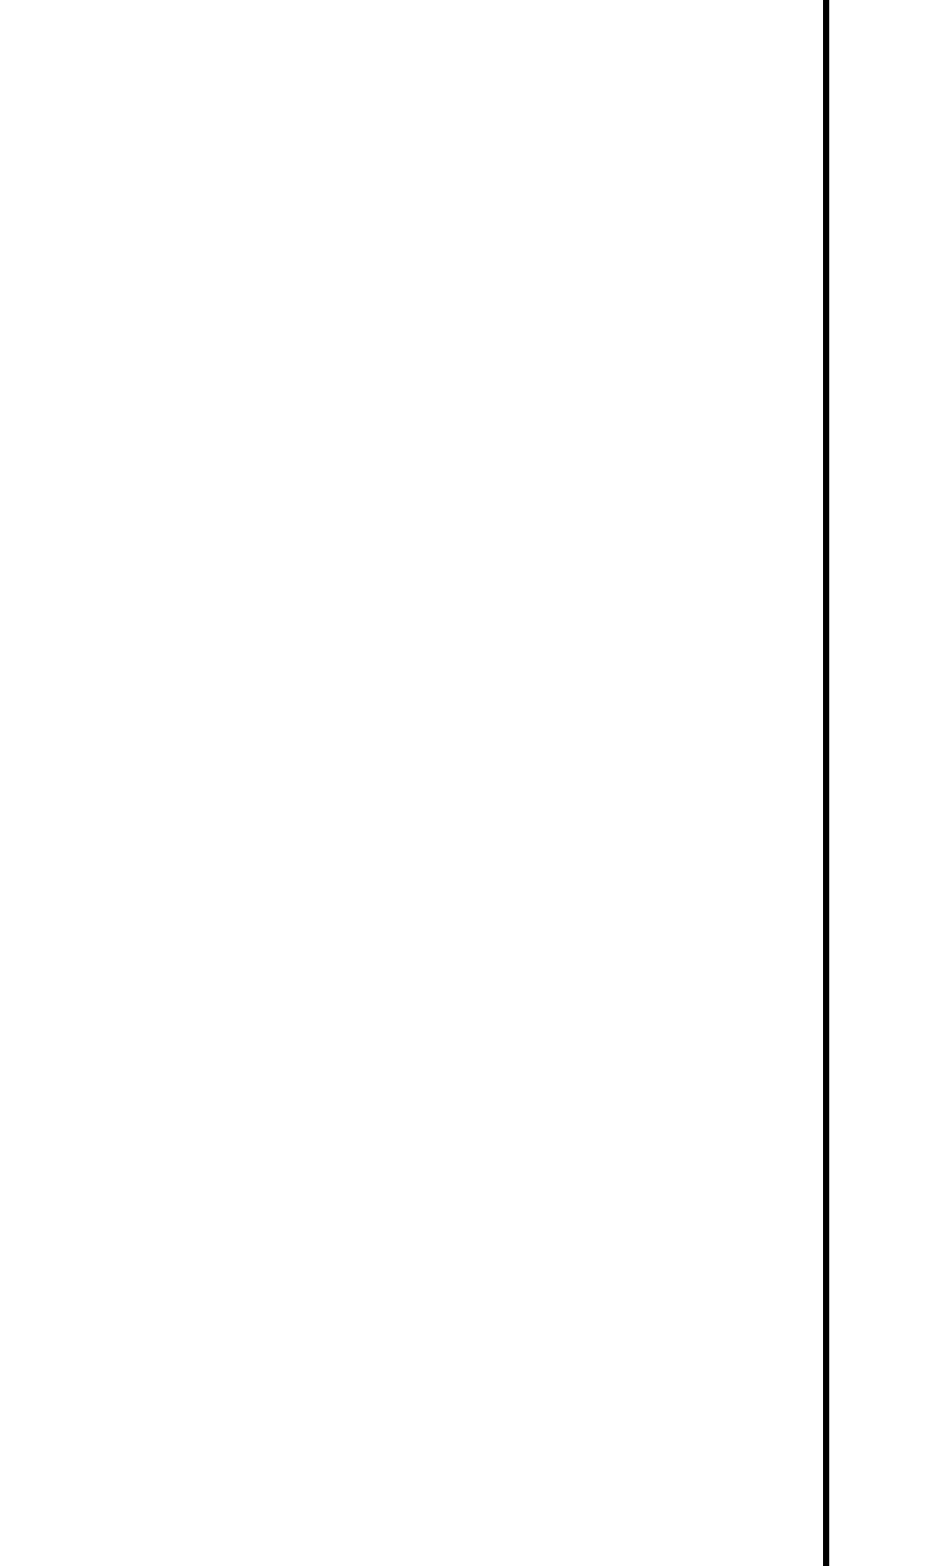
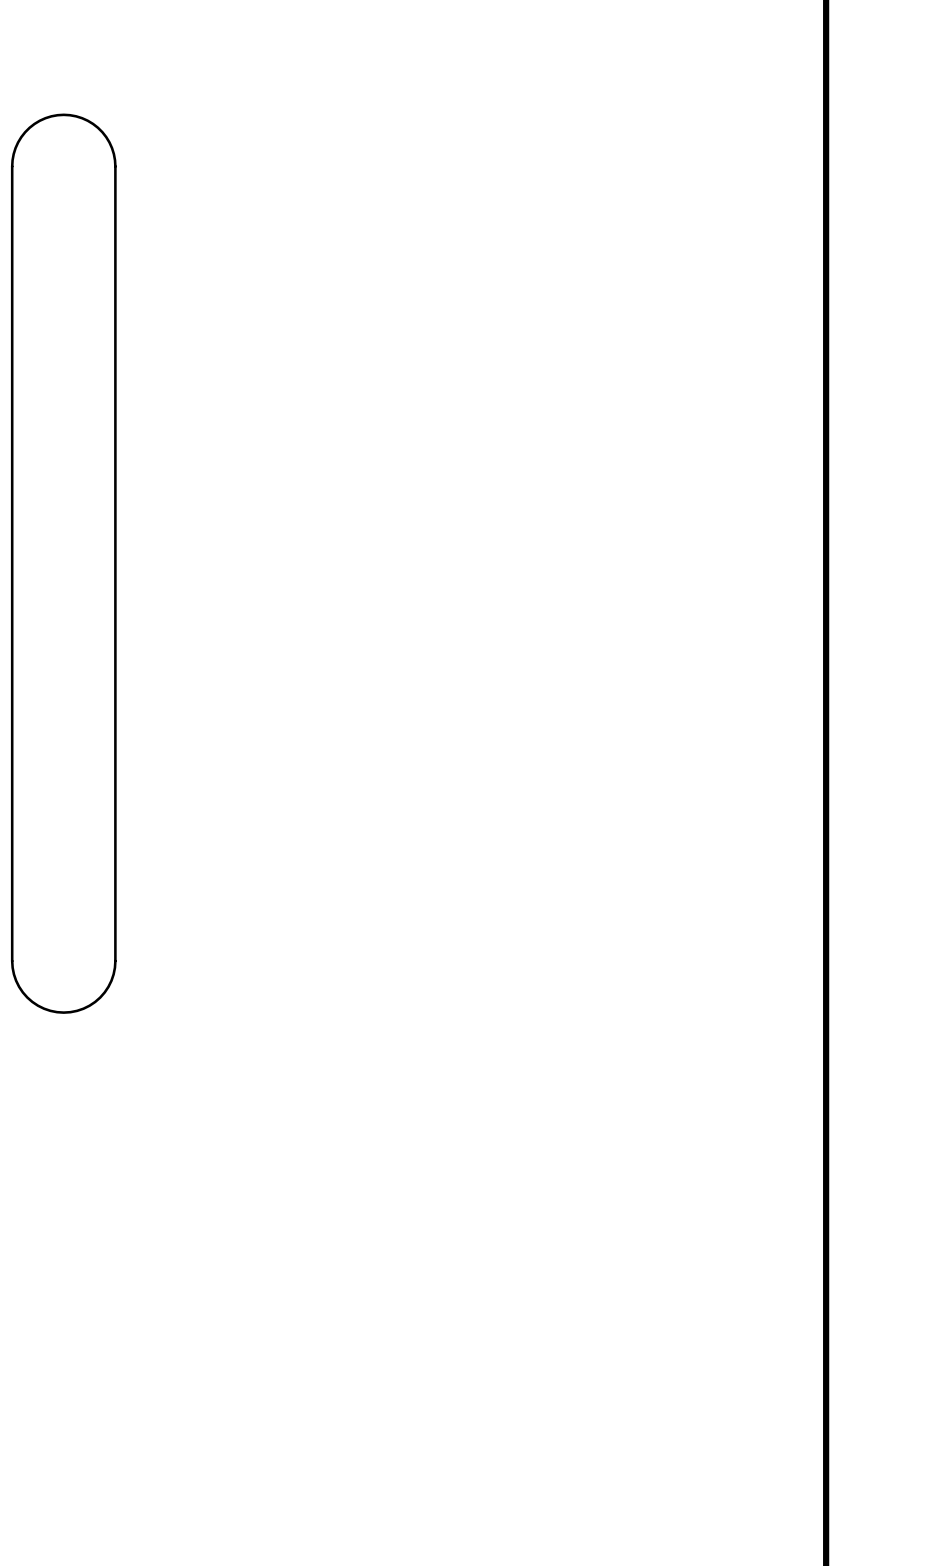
board edge: none -> (115, 166) (115, 961) (111, 980) (100, 997) (83, 1008) (63, 1012) (44, 1008) (27, 997) (16, 980) (12, 961) (12, 160) (18, 142) (29, 127) (45, 118) (63, 114) (82, 118) (98, 127) (109, 142) (115, 166)

